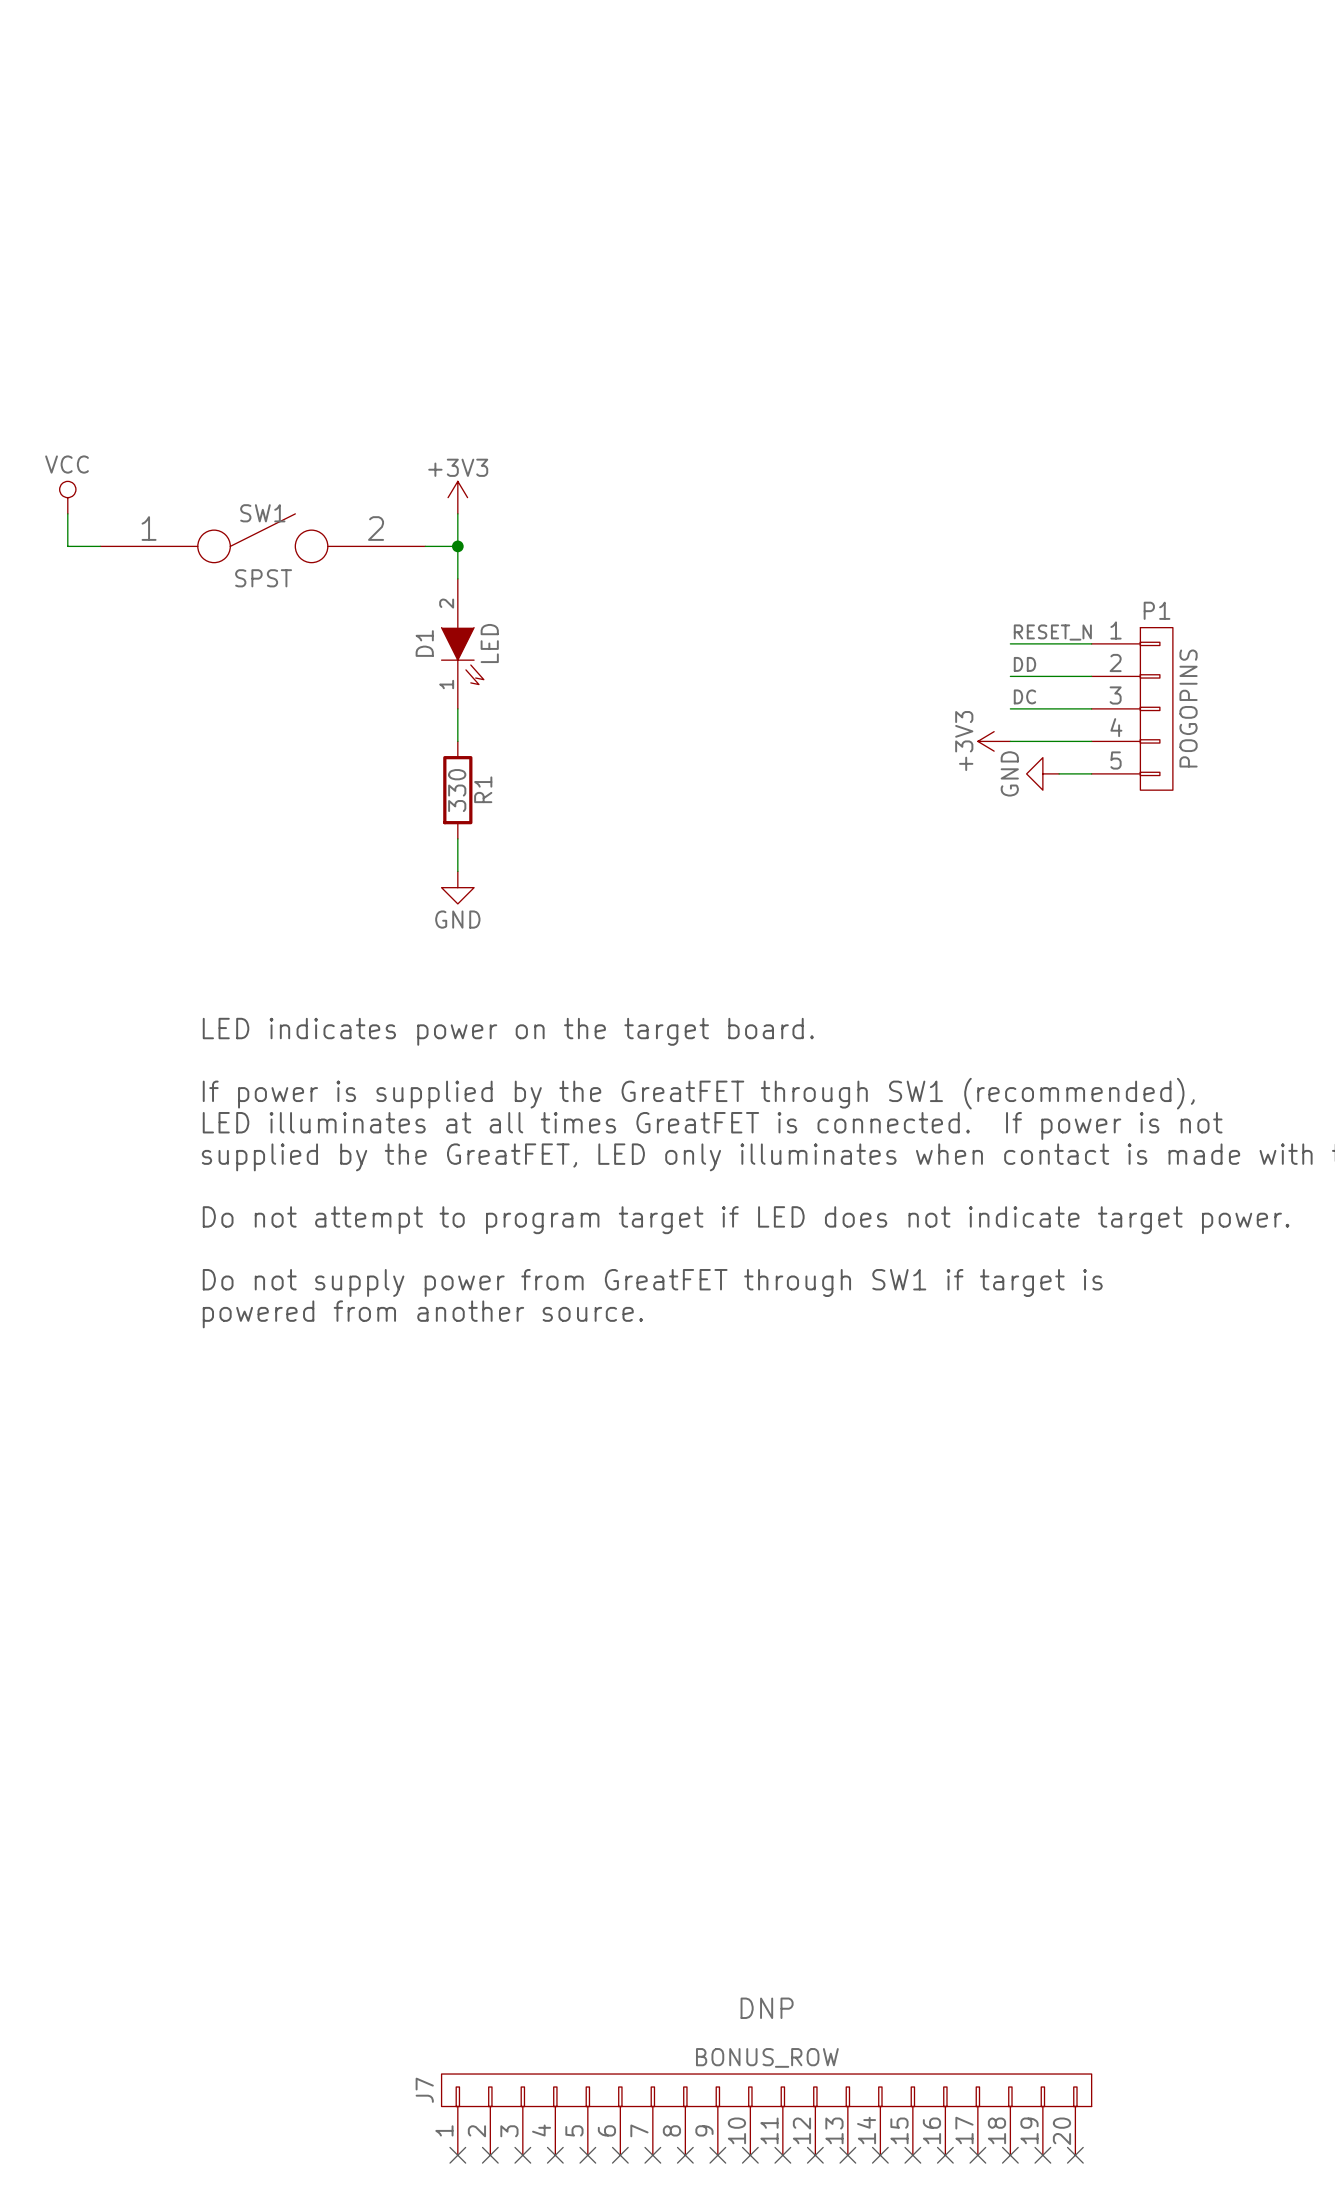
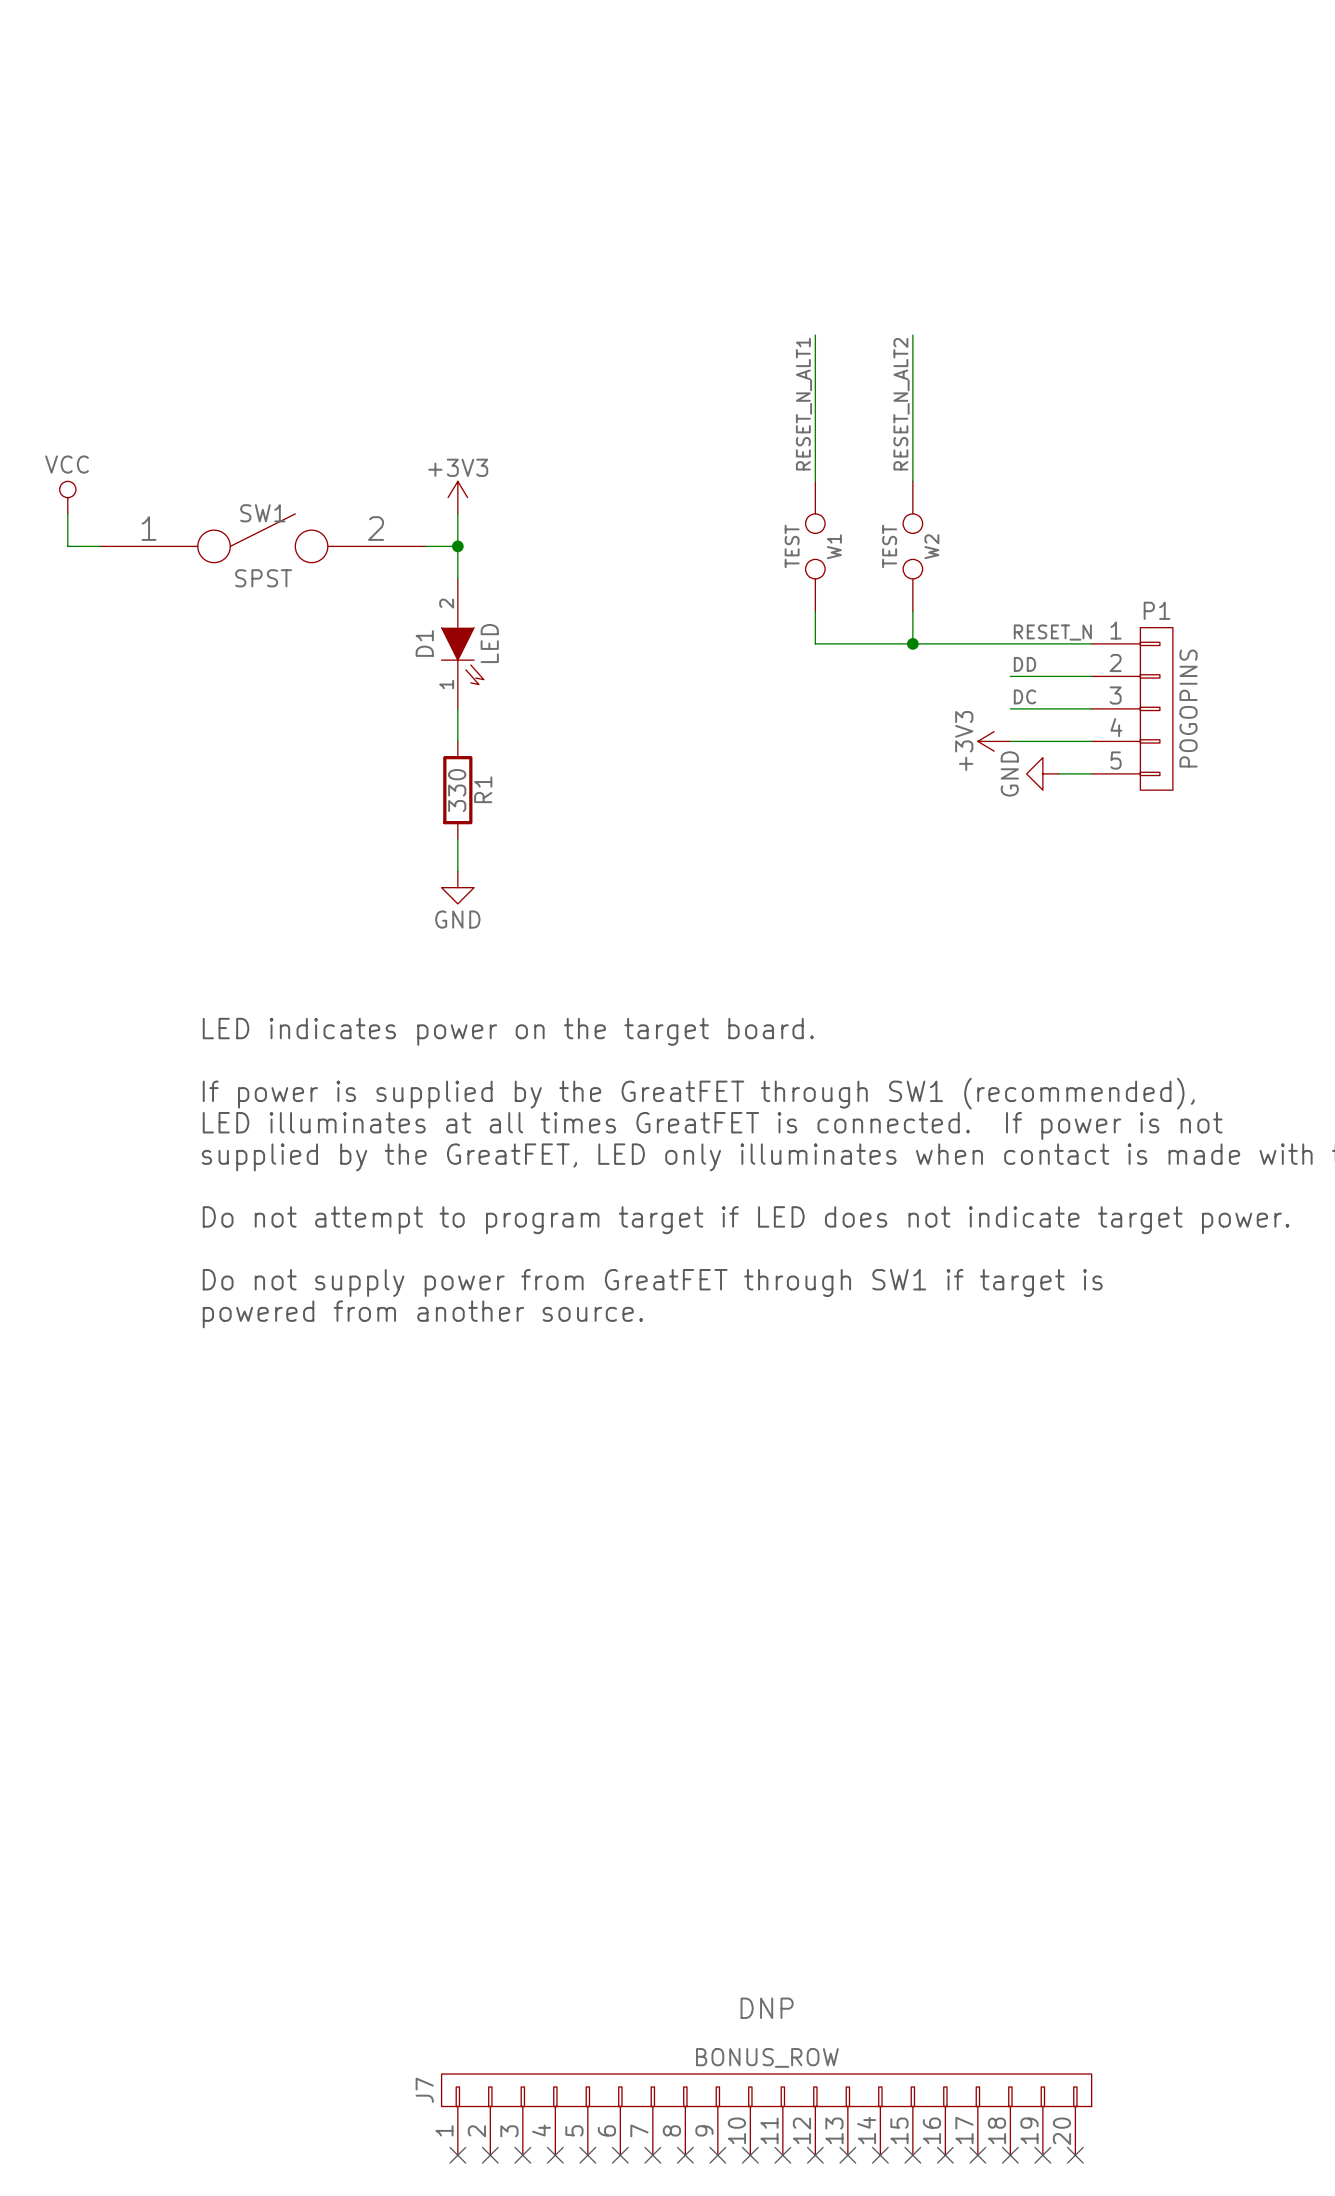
wire: none -> (815, 335) (815, 481)
wire: none -> (912, 335) (912, 481)
label: none -> RESET_N_ALT1 (803, 404)
label: none -> RESET_N_ALT2 (901, 404)
W1: none -> TEST (815, 546)
W2: none -> TEST (912, 546)
wire: none -> (815, 611) (815, 643) (1010, 643)
wire: none -> (912, 611) (912, 643)
junction: none -> (912, 643)

